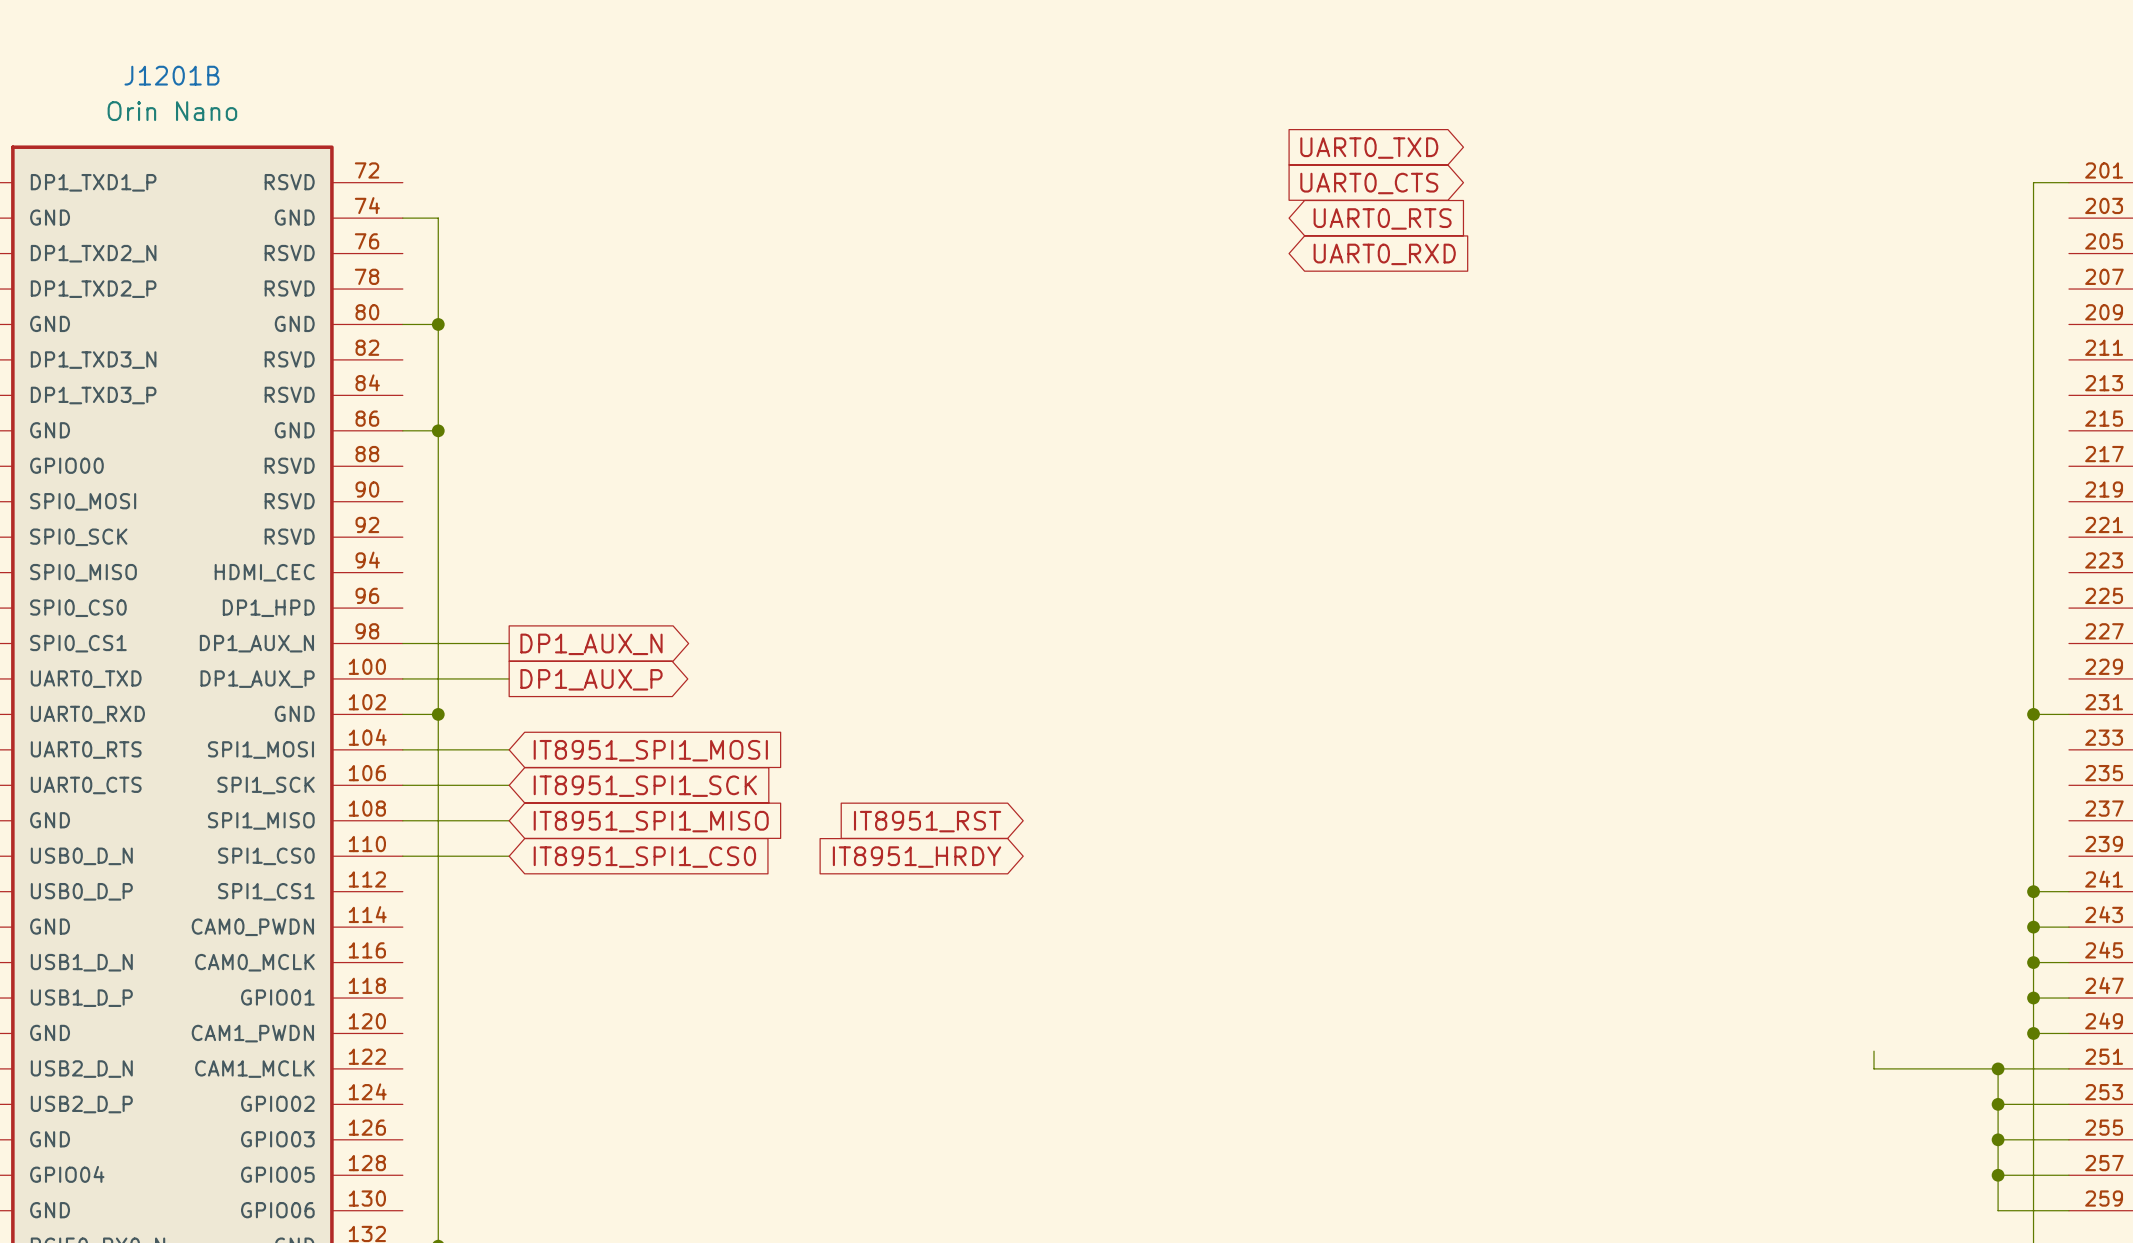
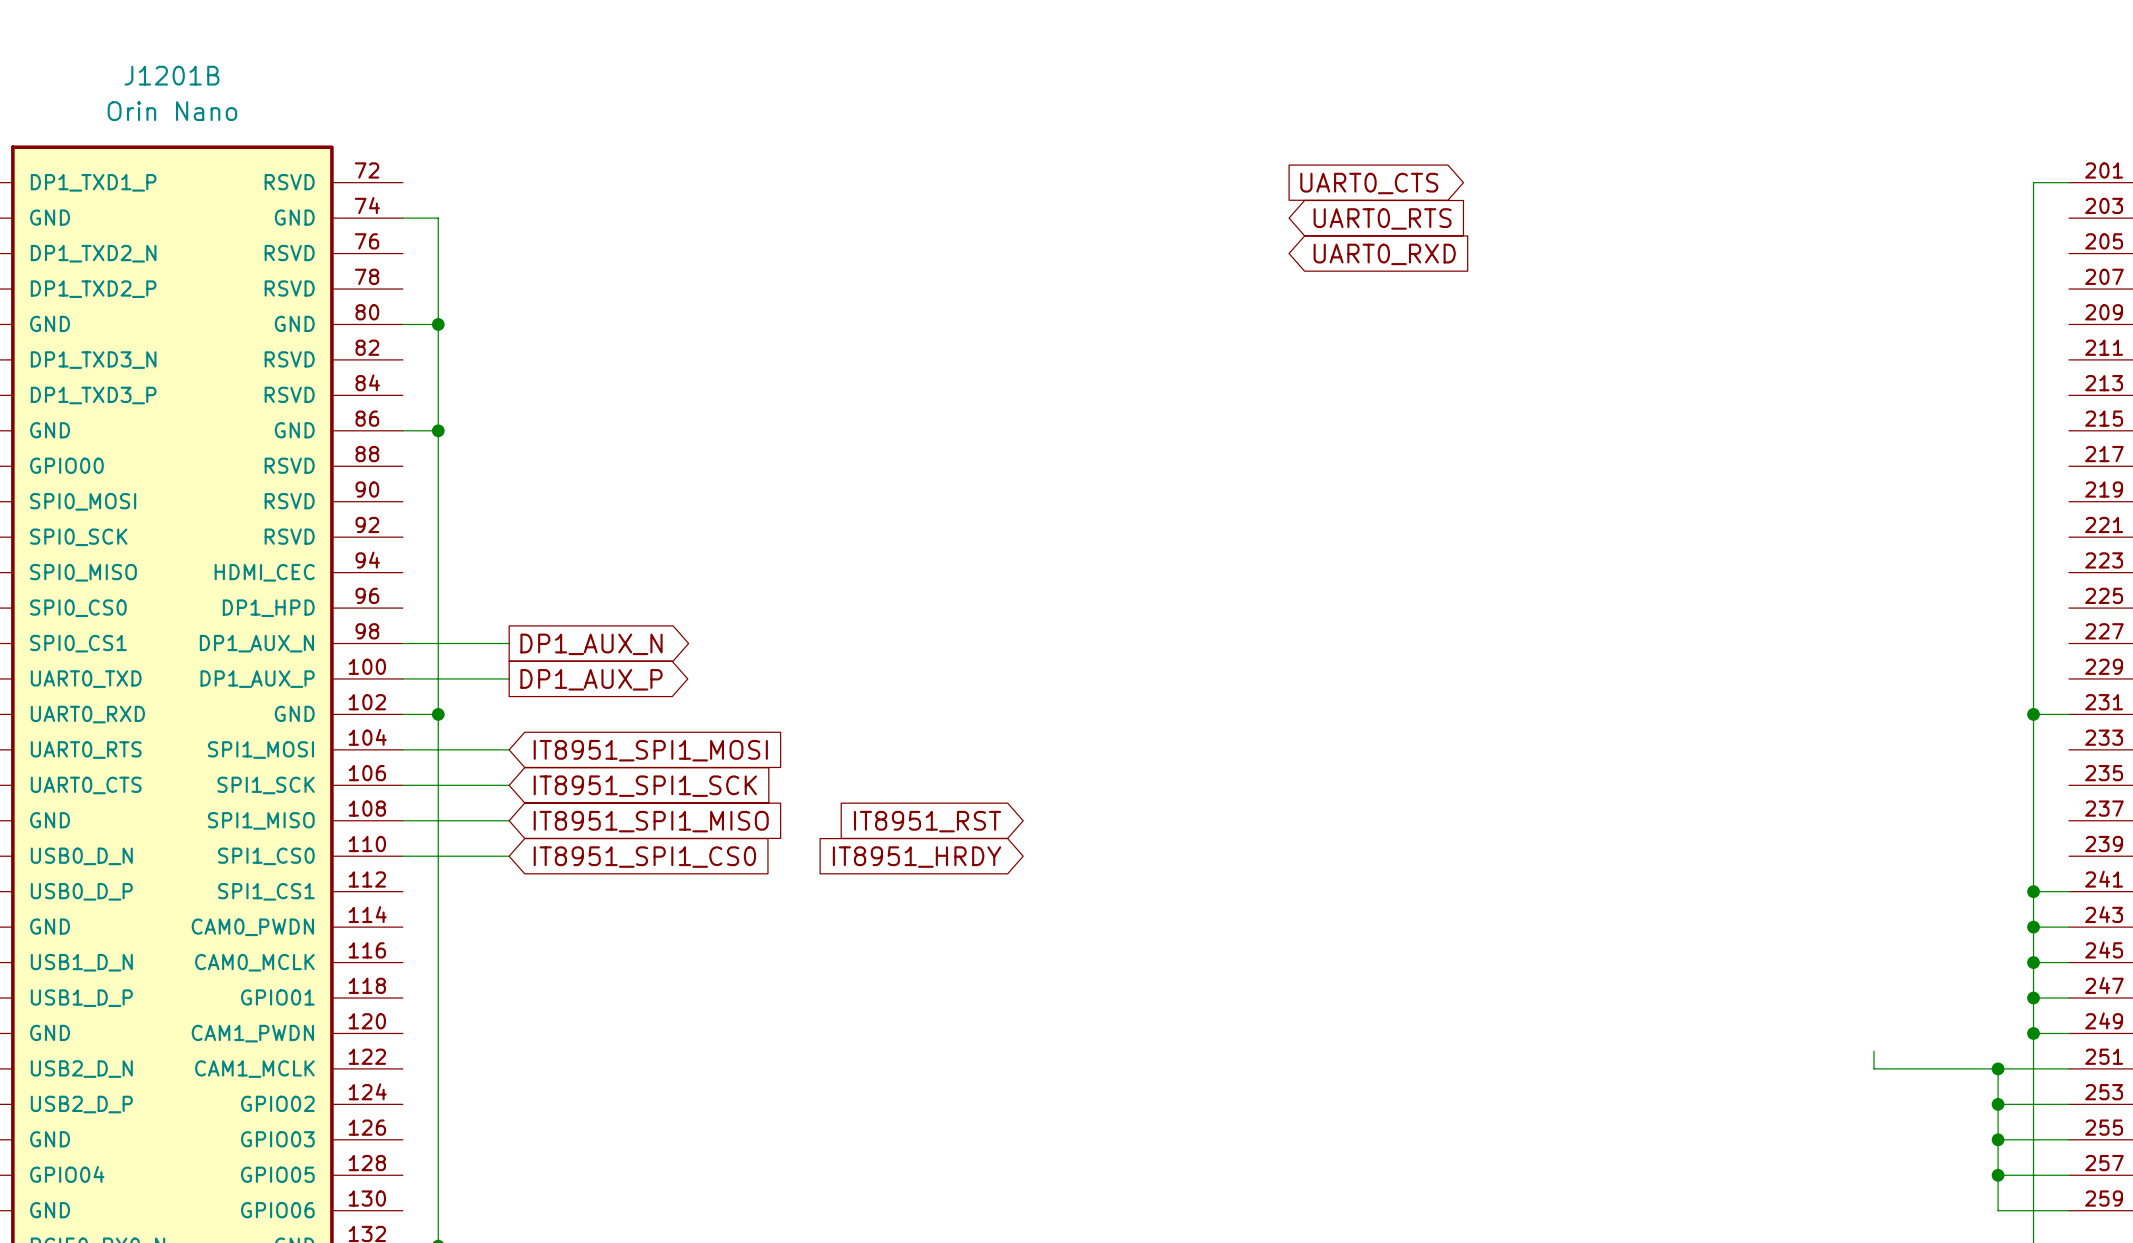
global label: UART0_TXD (1369, 148) -> none

